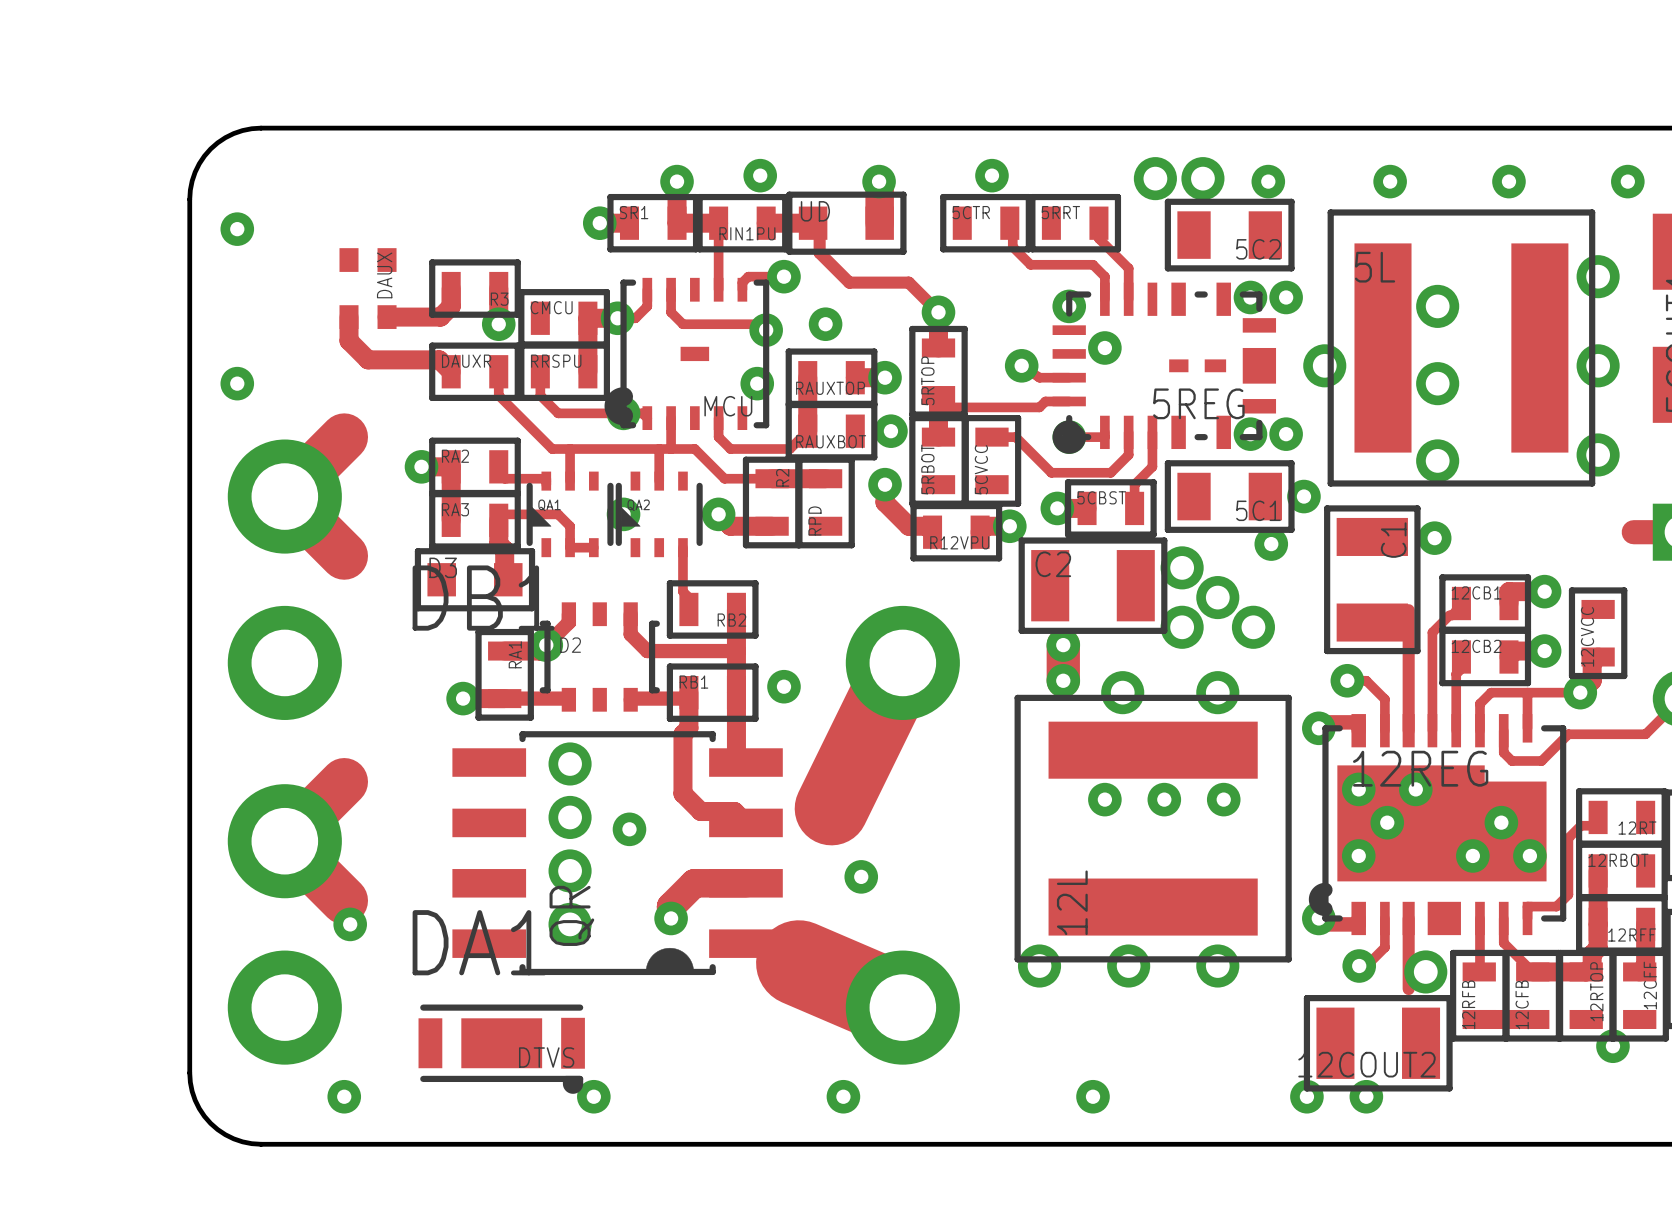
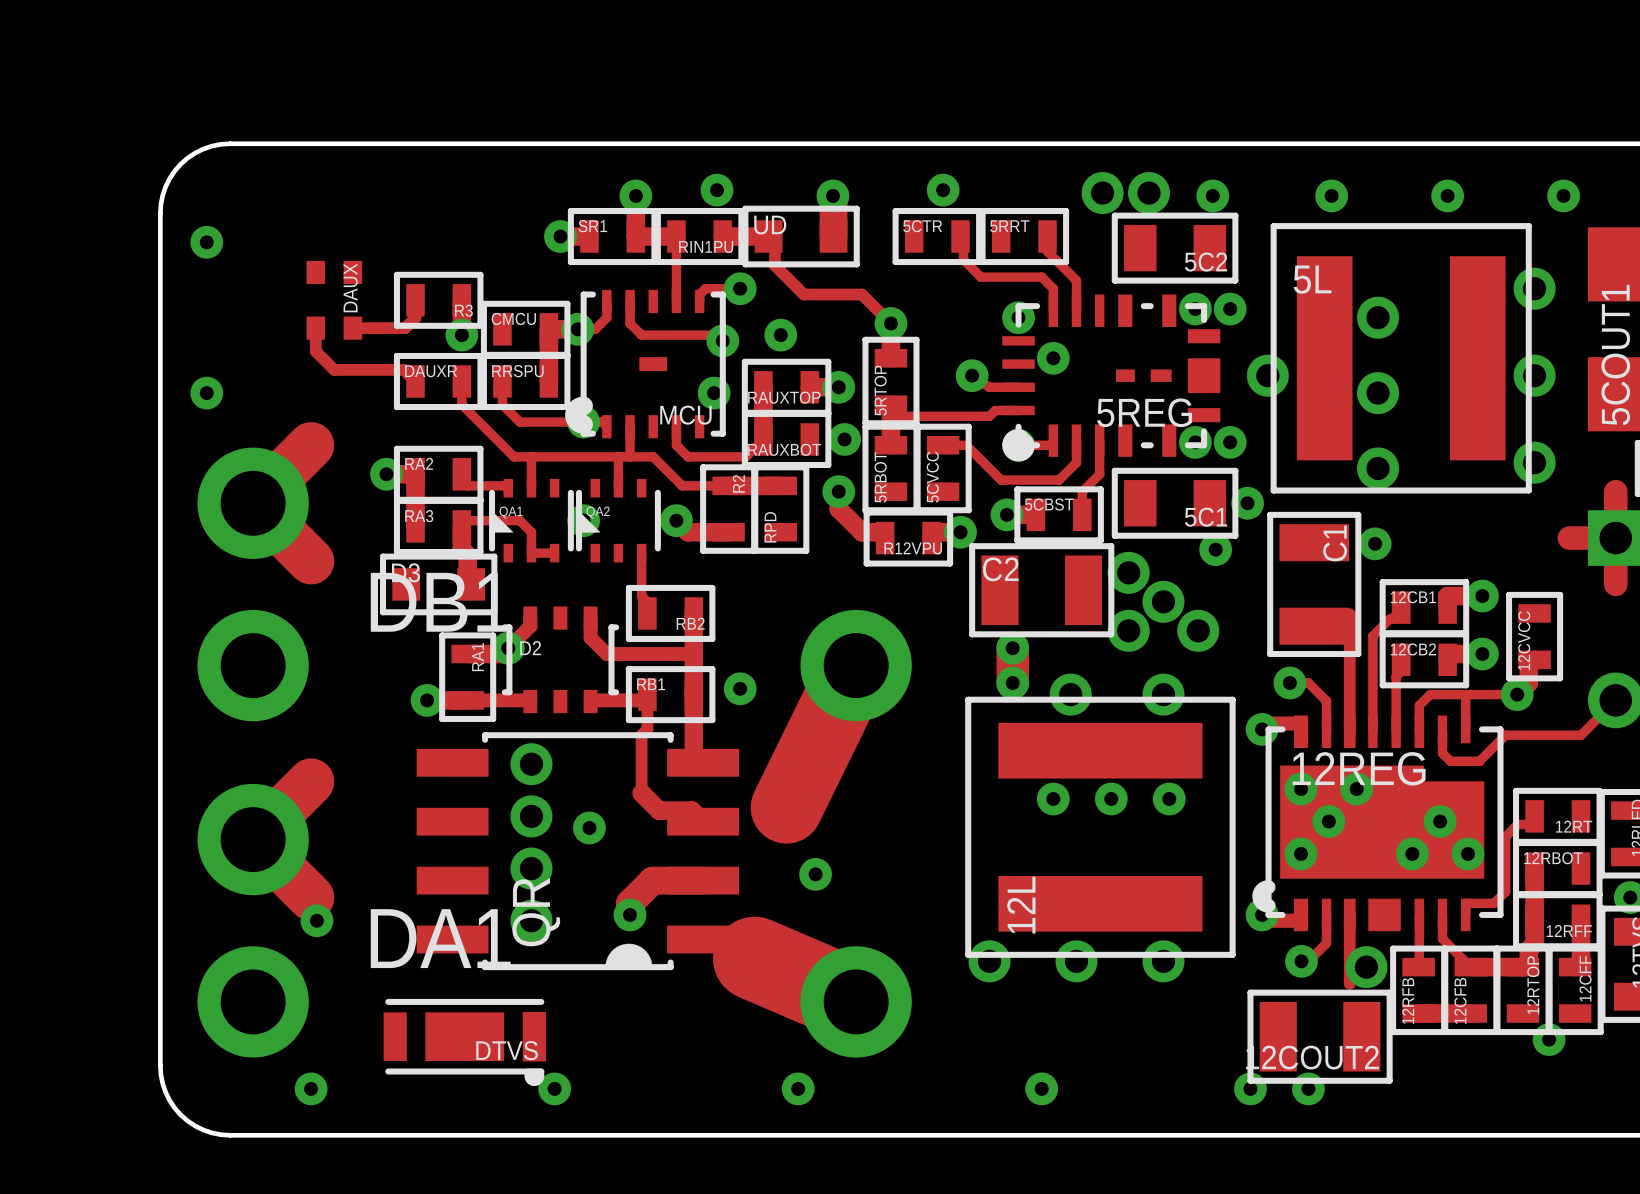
track width: thick (451, 288) (451, 306) (440, 317) (387, 317) -> thin (415, 300) (415, 317) (405, 328) (352, 328)
track width: thick (349, 317) (349, 340) (368, 359) (439, 359) (451, 371) -> thin (315, 328) (315, 351) (334, 369) (403, 369) (415, 381)
track width: thick (688, 692) (688, 728) (682, 734) (682, 793) -> thin (647, 694) (647, 729) (641, 735) (641, 793)

